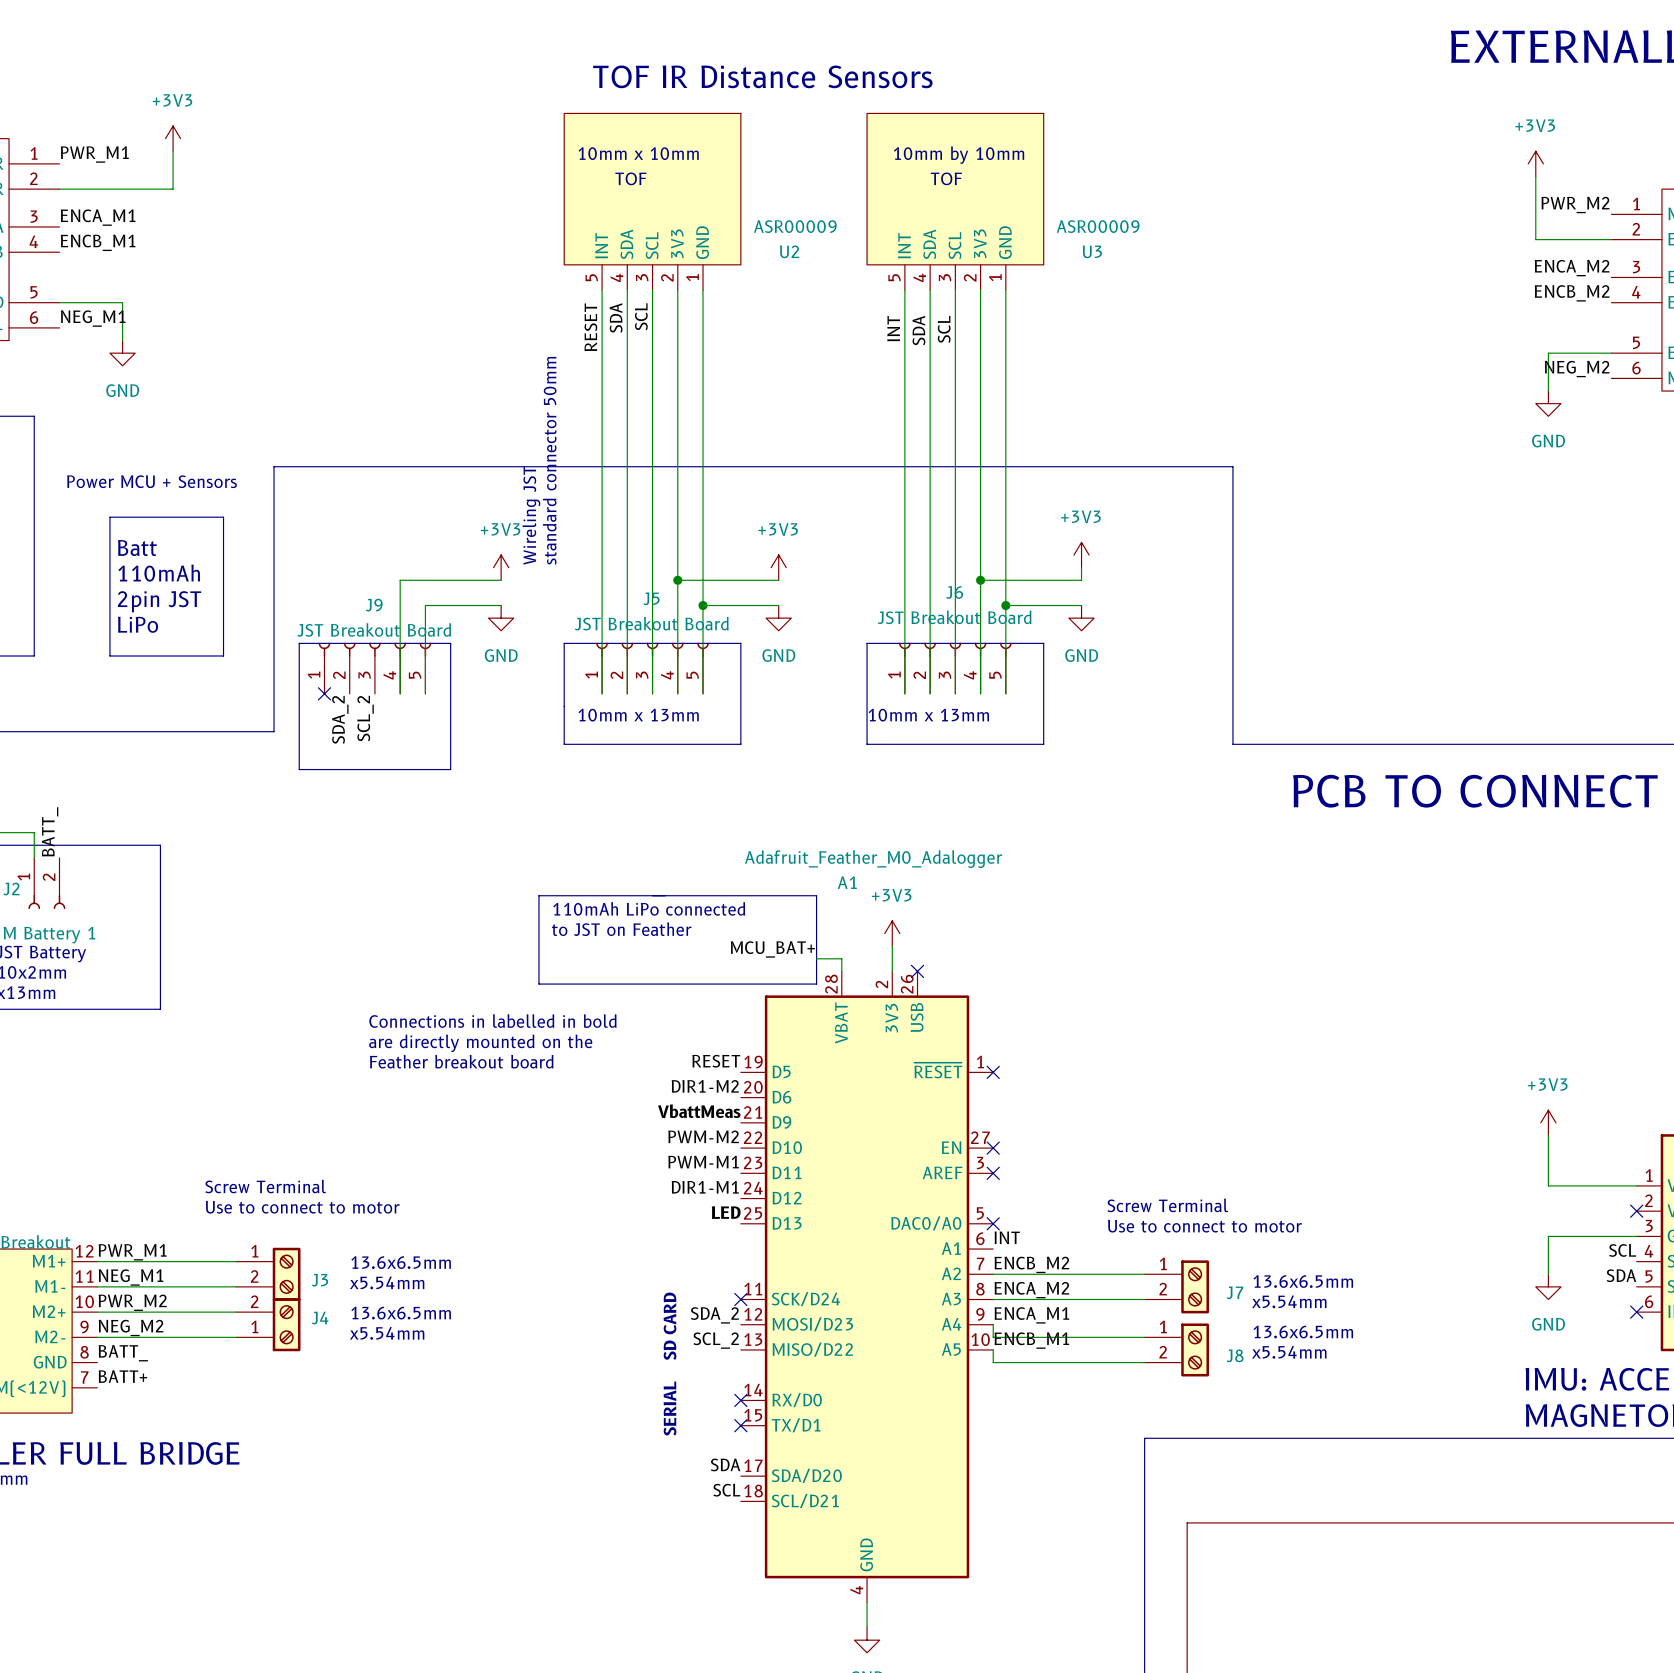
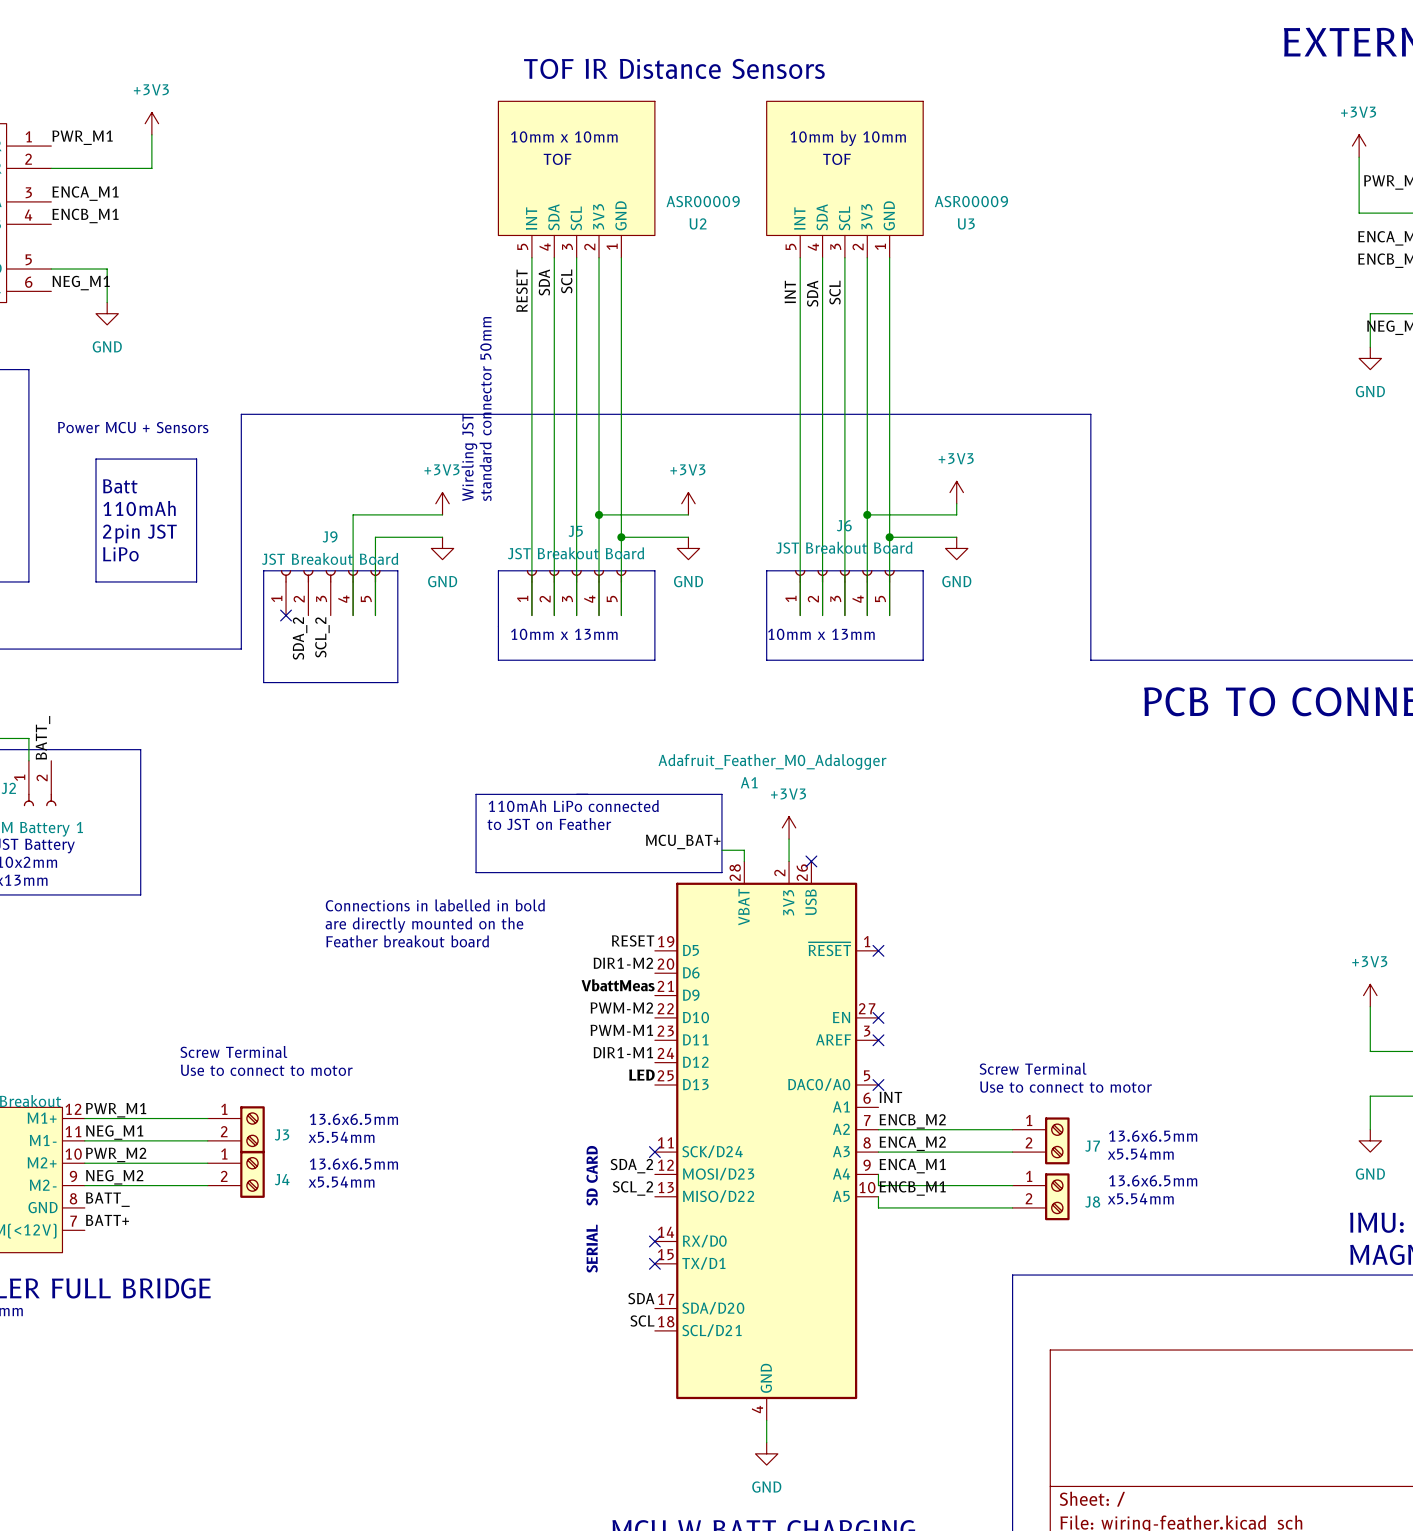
J4 flip: as is (286, 1324) -> up-down (252, 1174)

